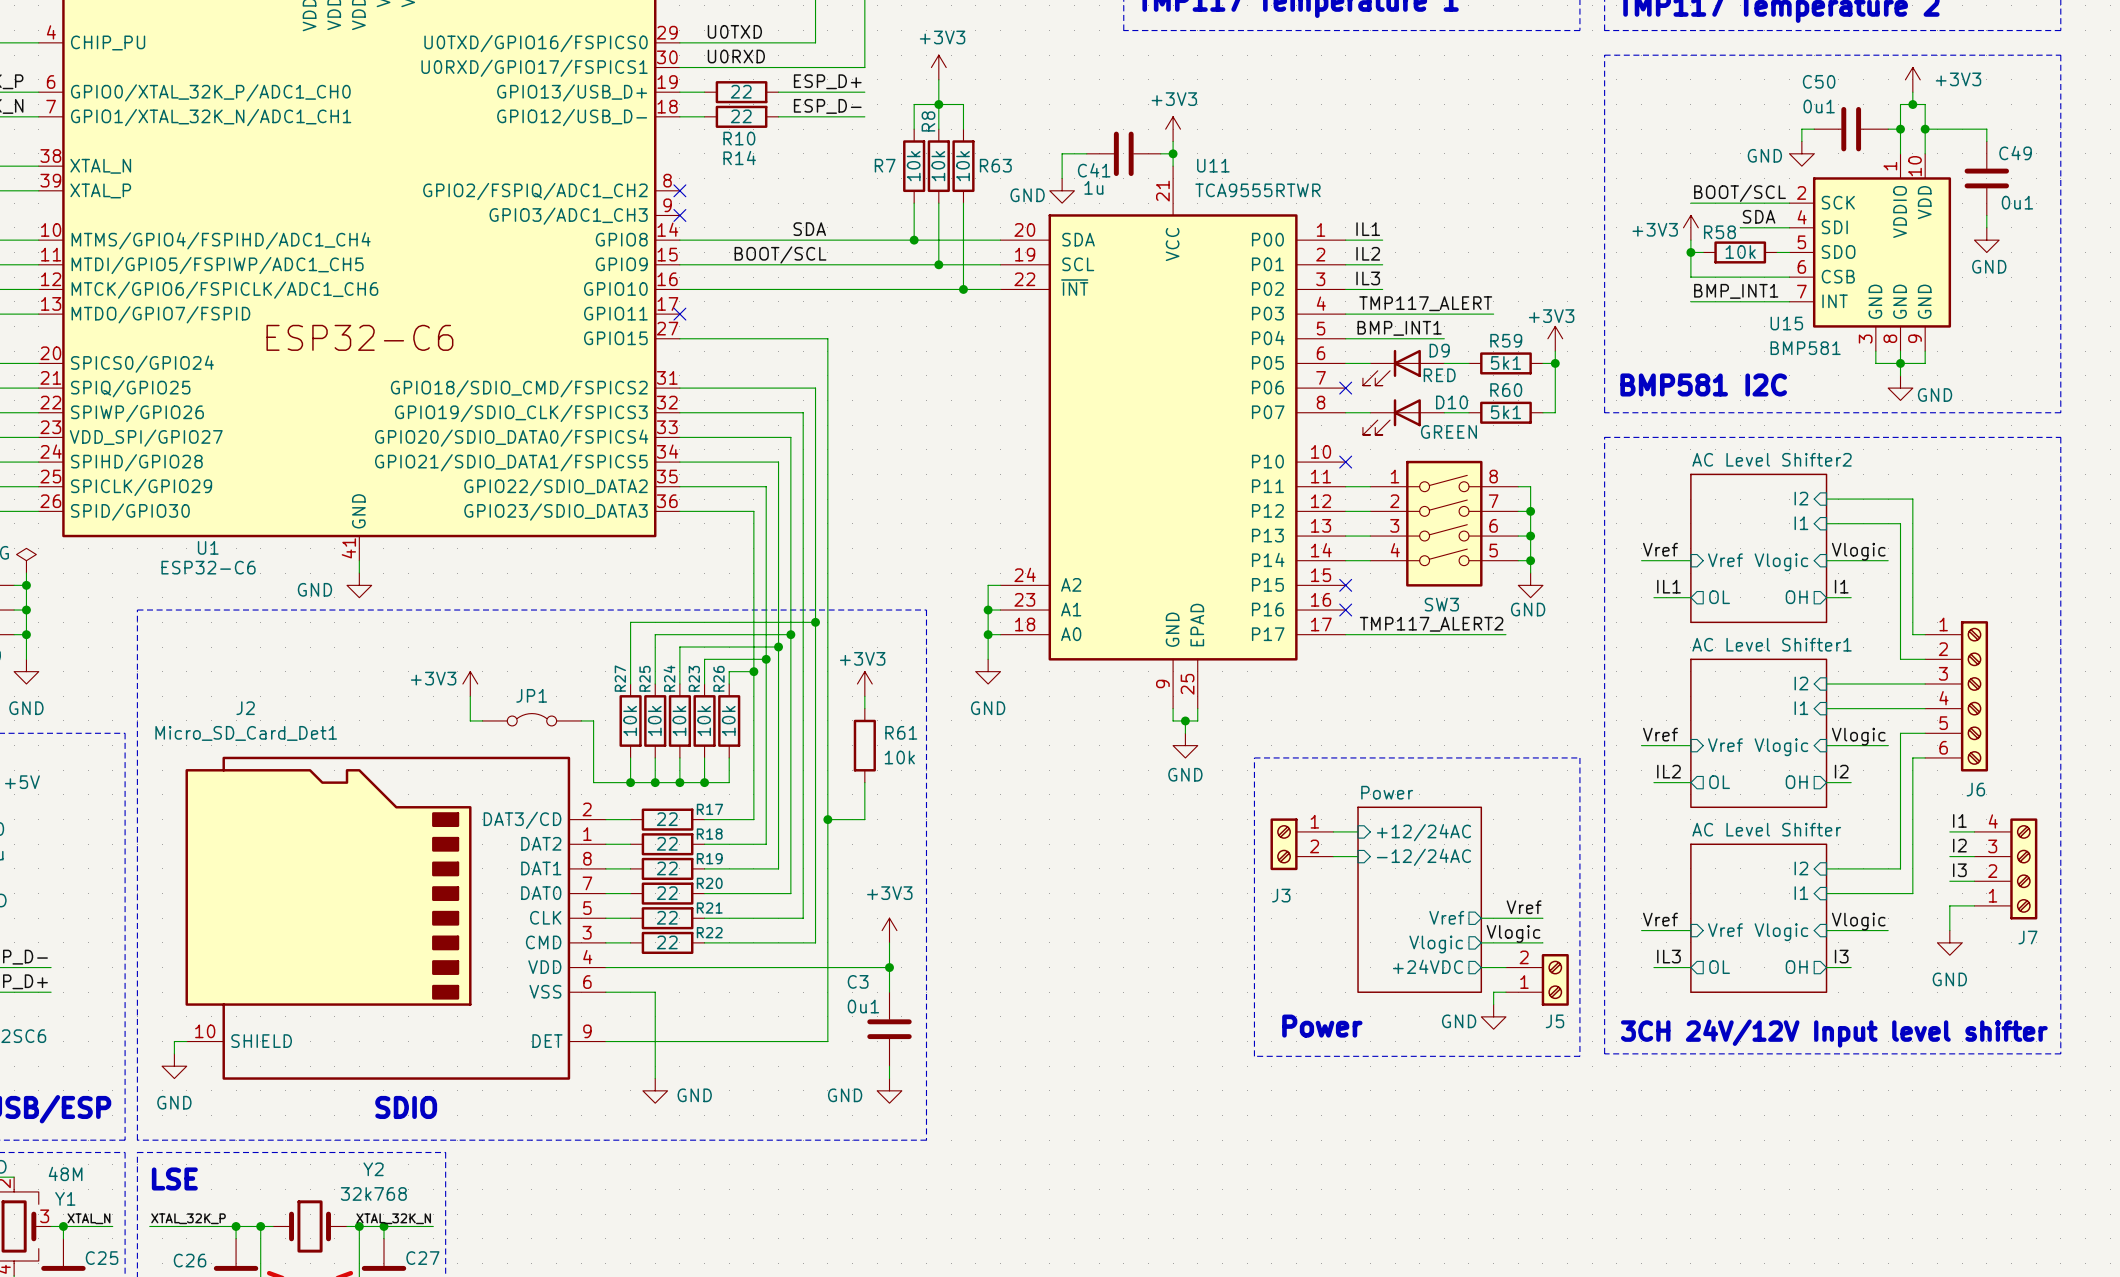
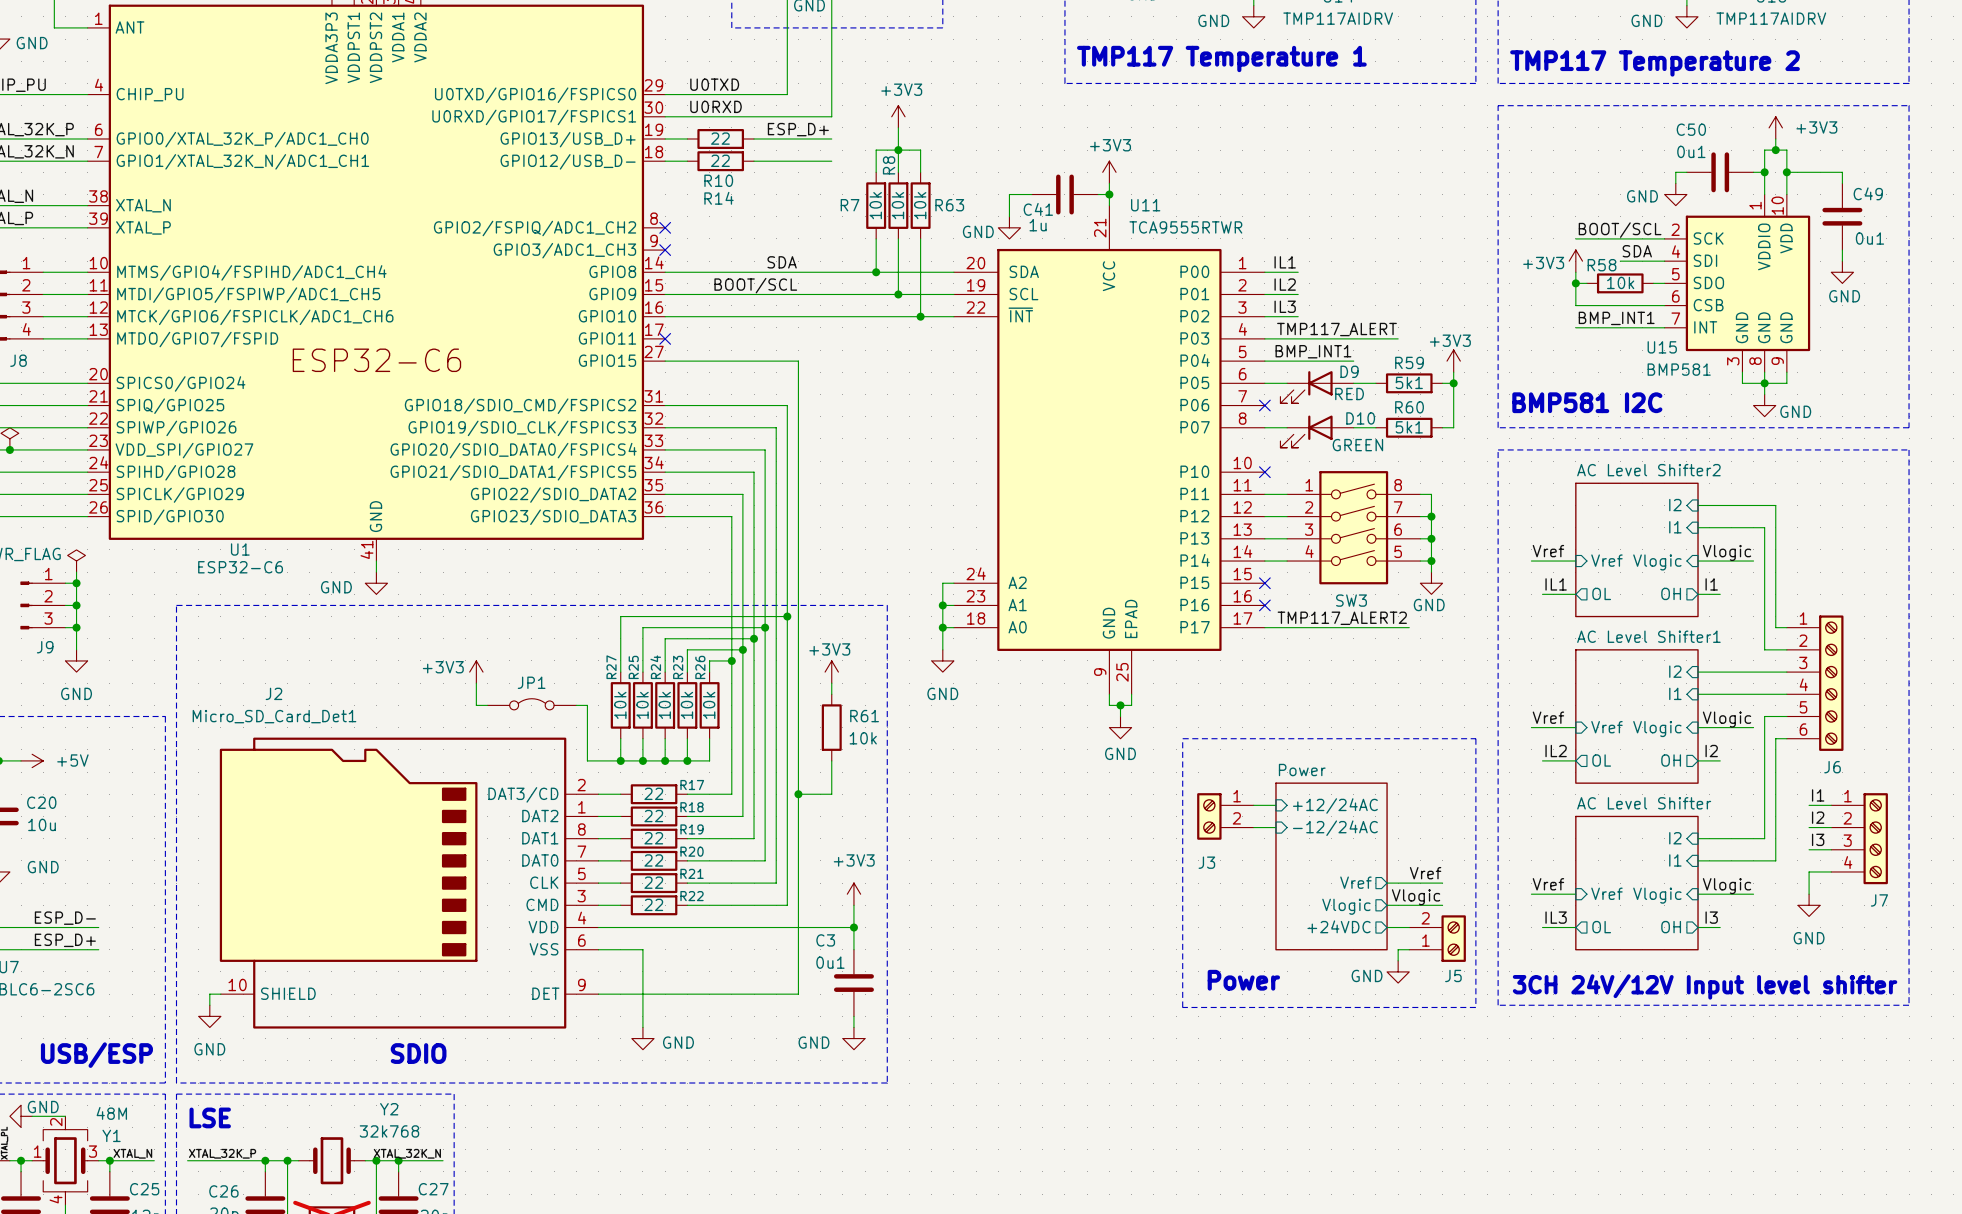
label: ESP_D- (827, 106) -> none
J7 flip: as is (2023, 868) -> up-down (1875, 838)

